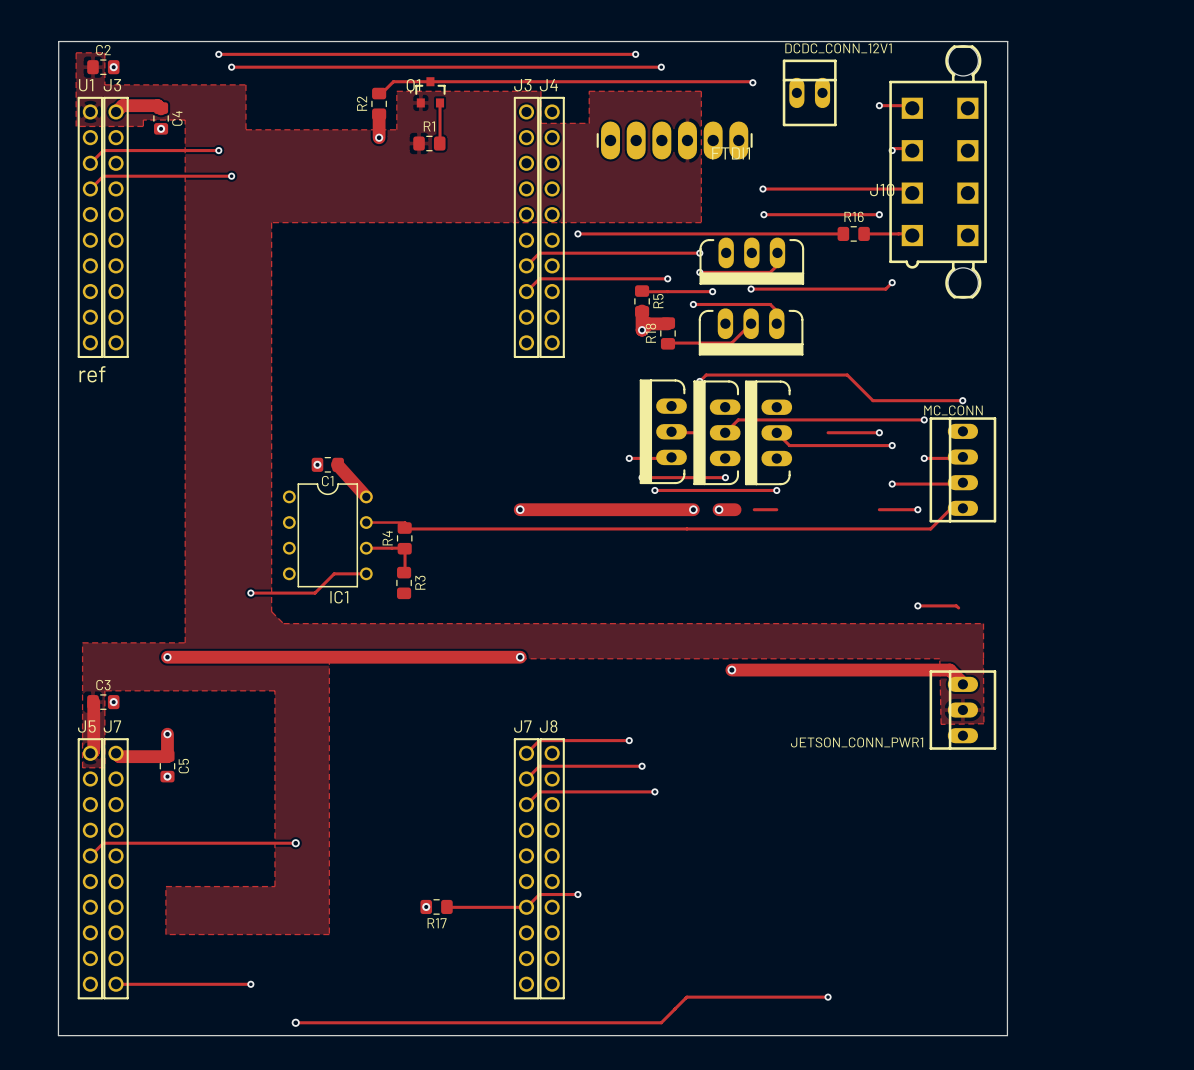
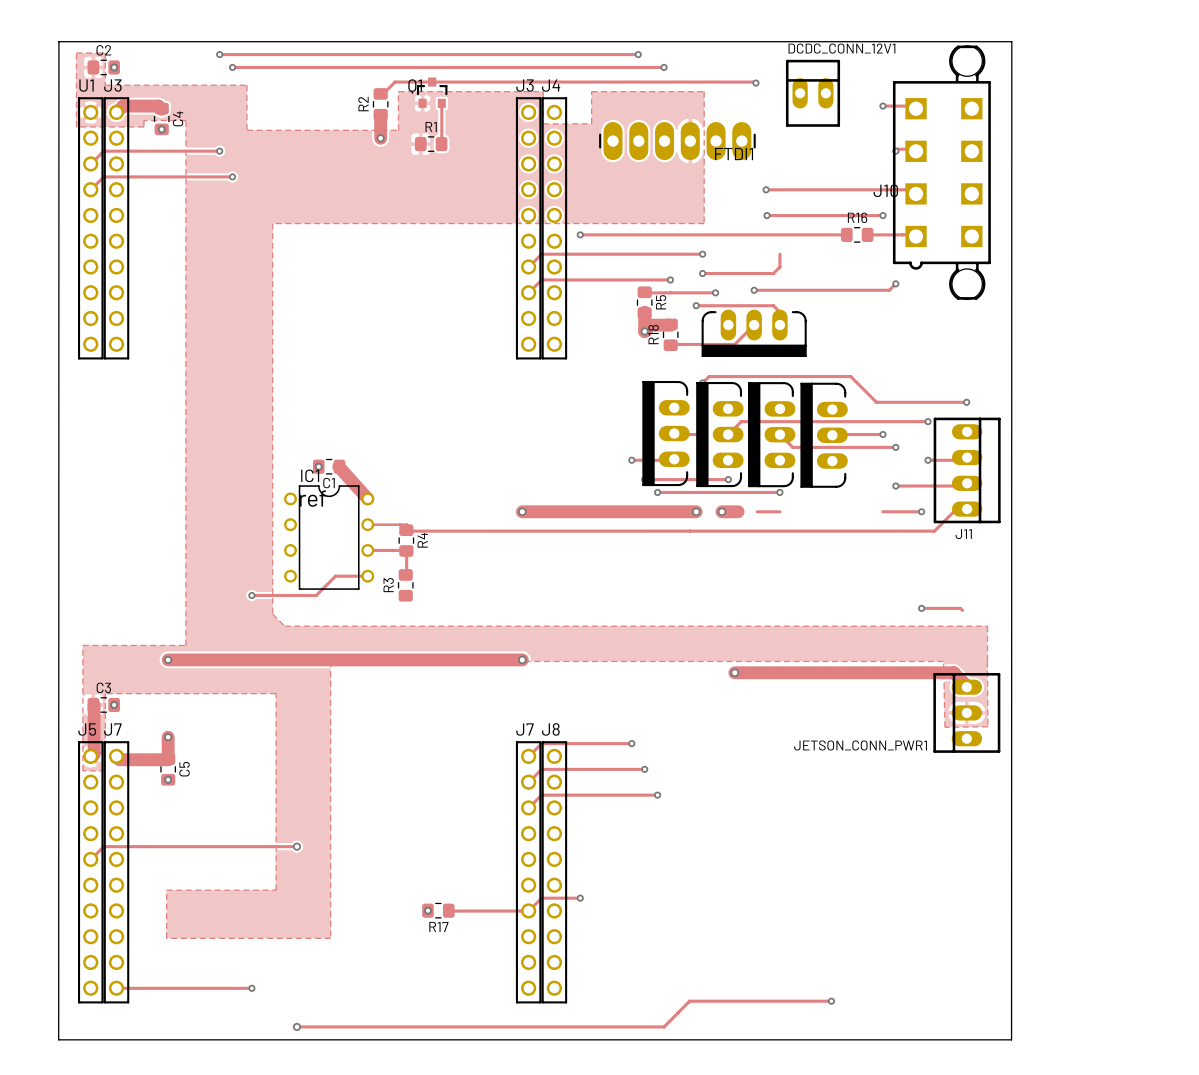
part rotation: 0° (751, 261) -> 90° clockwise (824, 435)
part position: (751, 261) -> (824, 435)
U1 text position: ref (92, 374) -> ref (312, 498)
J11: none -> (967, 470)
part: MC_CONN (962, 469) -> none
R4 name position: R4 (387, 538) -> R4 (422, 540)
R3 name position: R3 (420, 582) -> R3 (388, 585)
IC1 name position: IC1 (339, 597) -> IC1 (310, 475)

